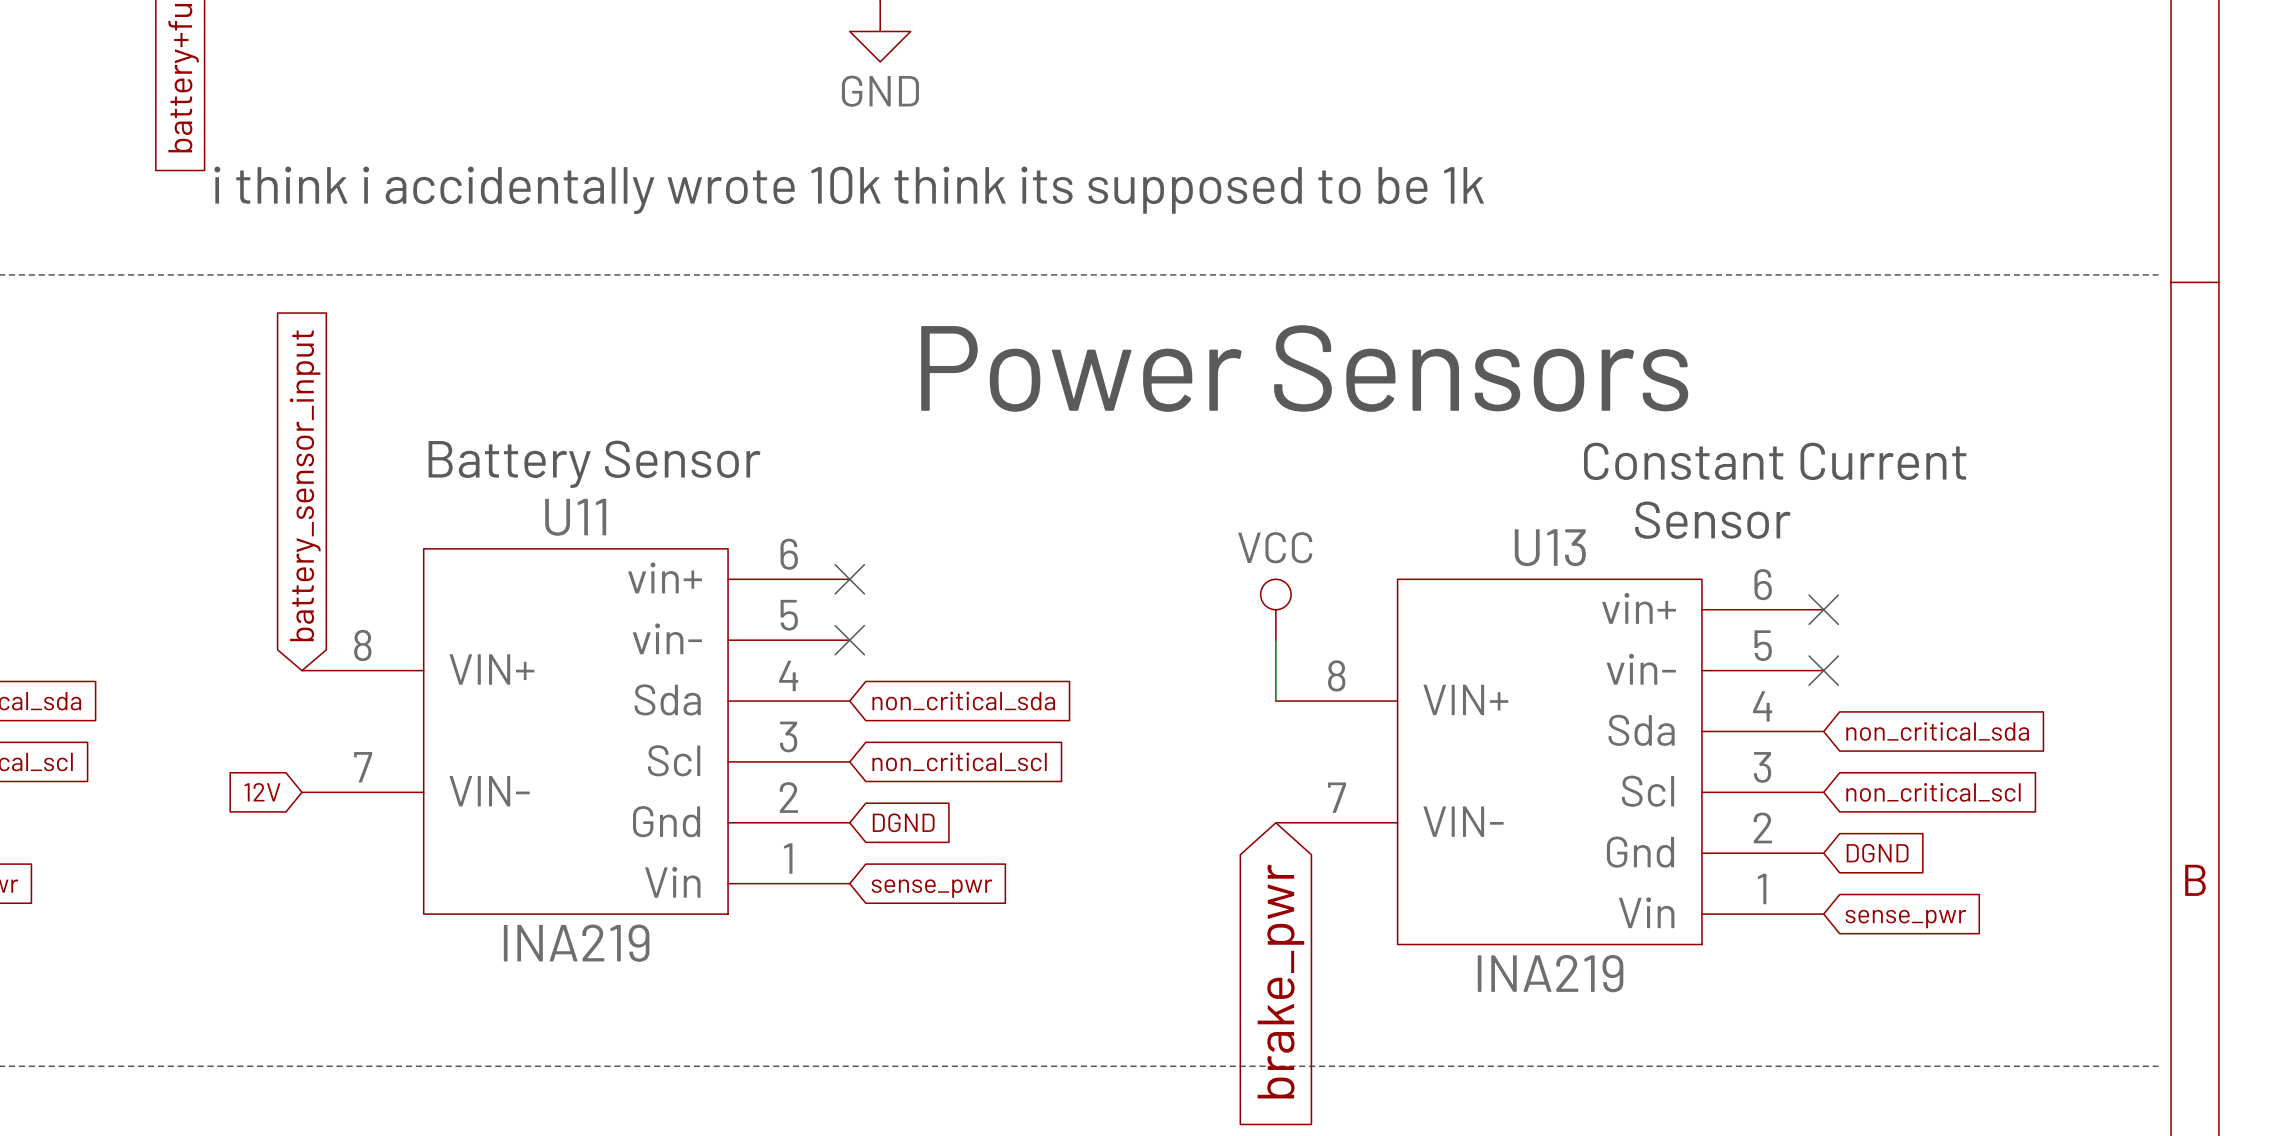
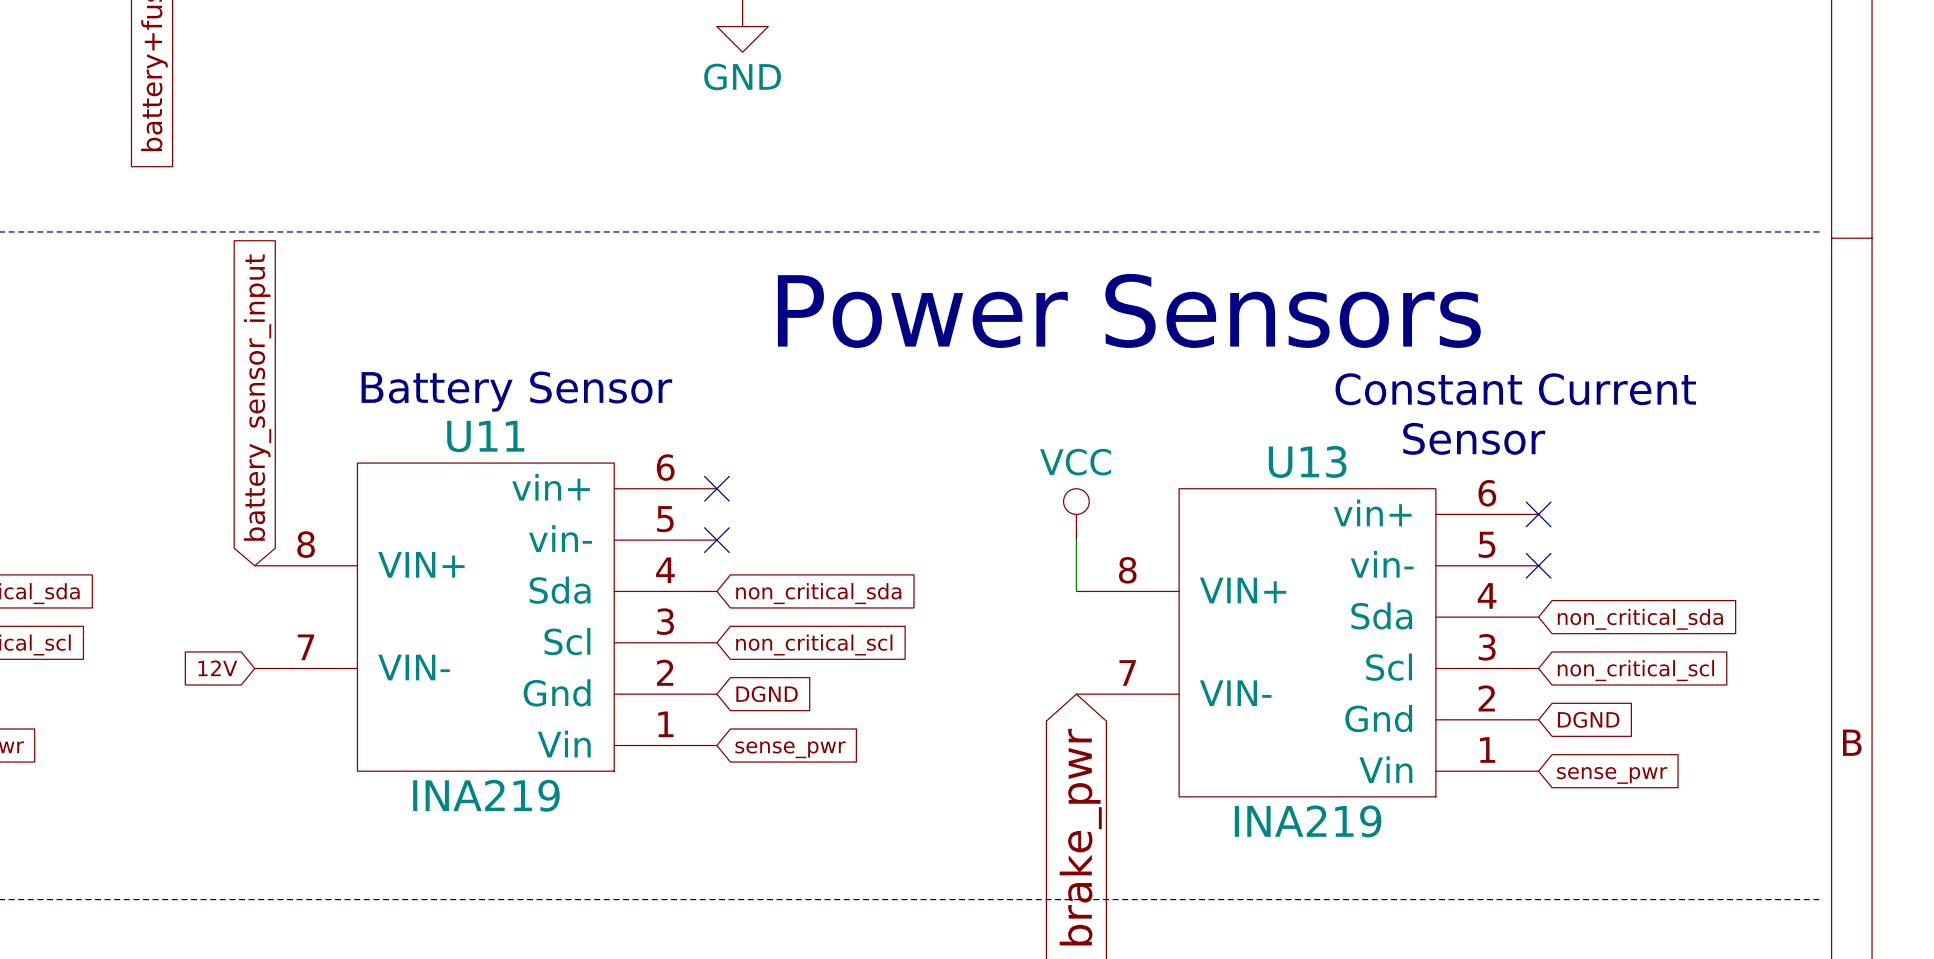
text: i think i accidentally wrote 10k think its supposed to be 1k (849, 190) -> none

